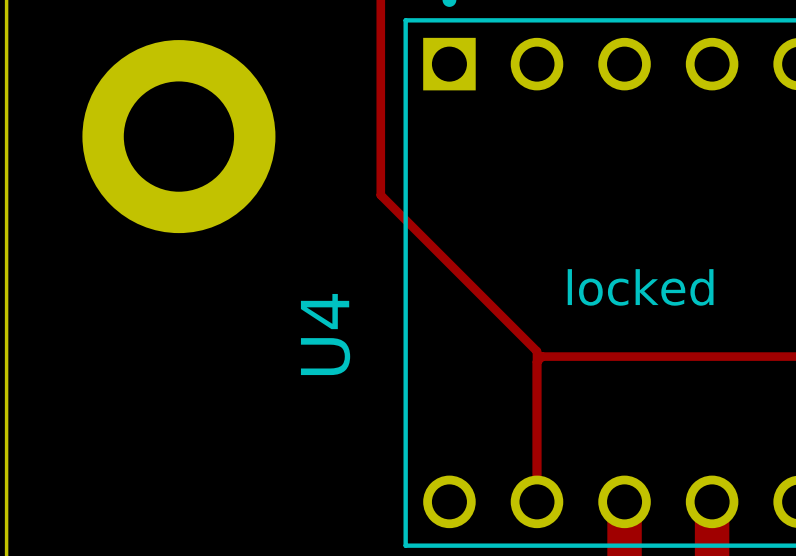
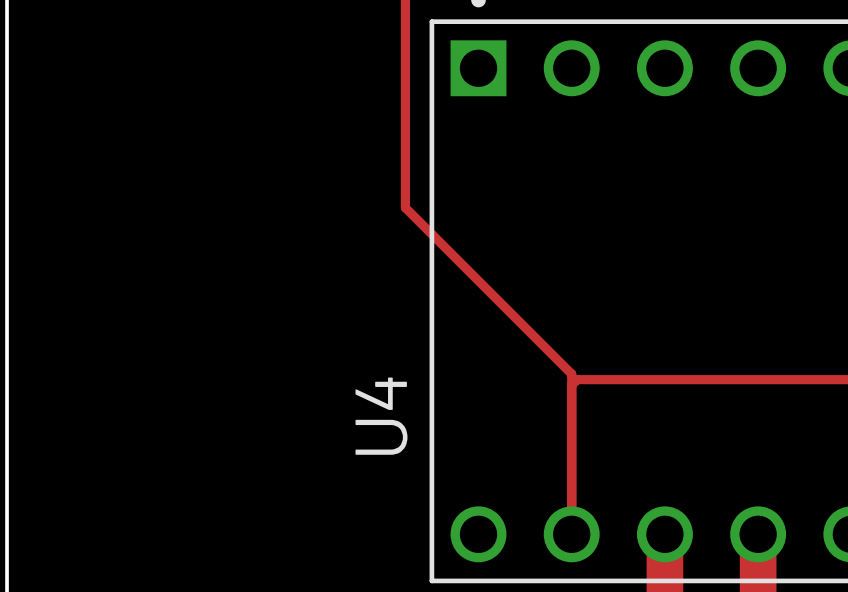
part: (178, 136) -> none
text: locked (640, 287) -> none
U4 name position: U4 (325, 334) -> U4 (381, 416)

